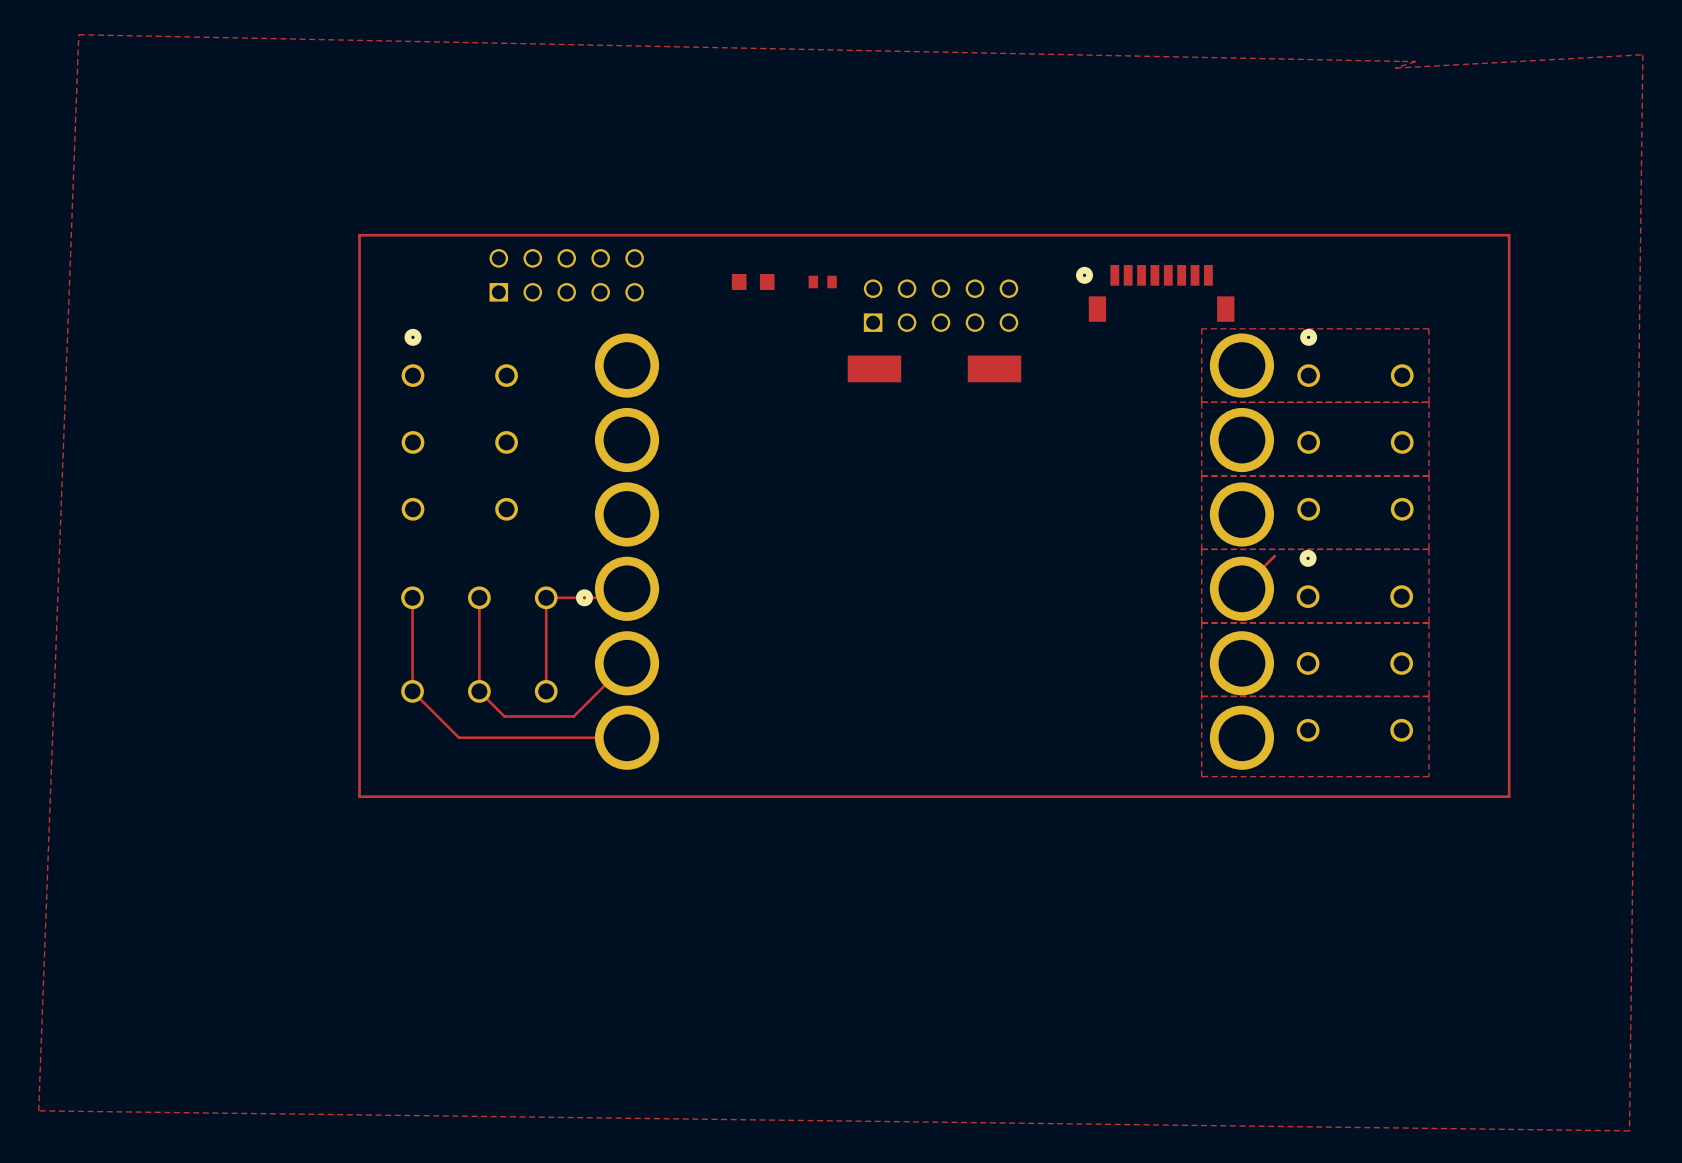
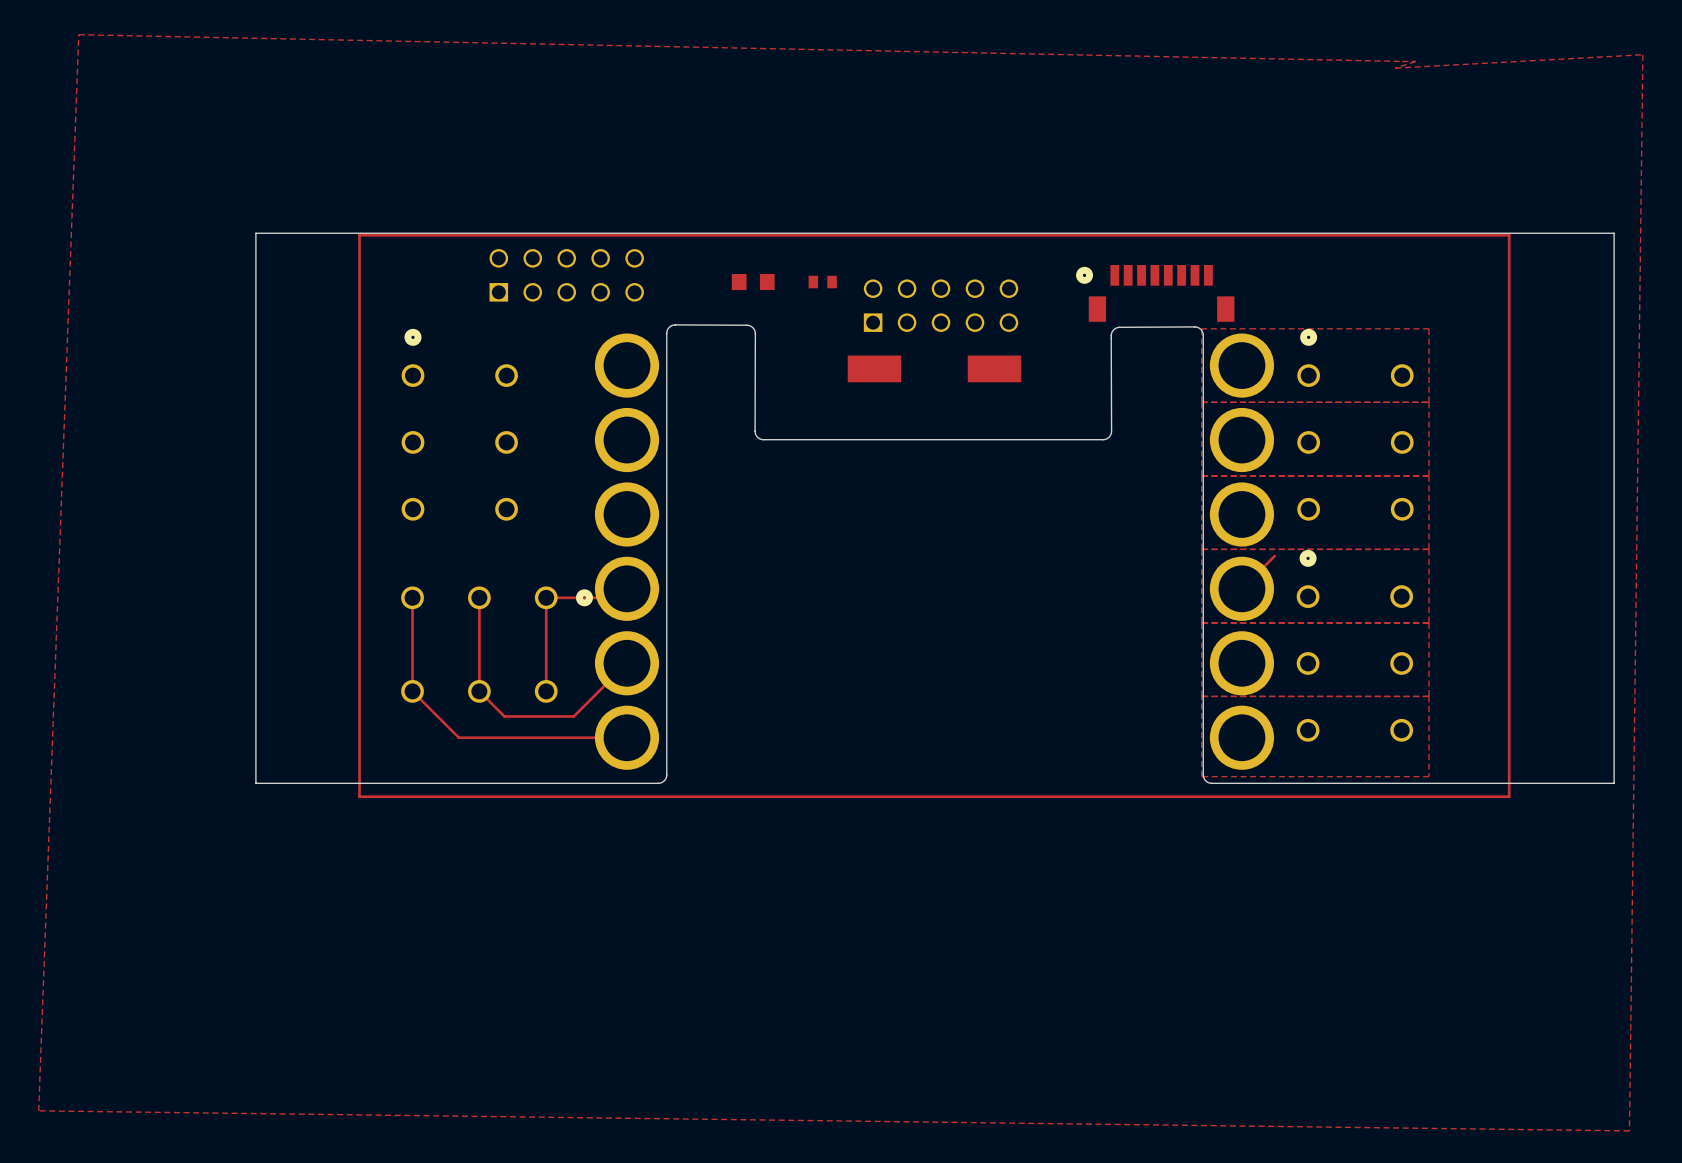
board edge: none -> (1614, 233) (1614, 783) (1211, 783) (1205, 780) (1203, 774) (1203, 335) (1198, 327) (1119, 327) (1112, 330) (1111, 335) (1111, 432) (1109, 436) (1104, 439) (763, 439) (758, 437) (755, 432) (755, 333) (753, 328) (746, 325) (675, 324) (669, 327) (666, 333) (666, 774) (664, 780) (658, 783) (255, 783) (255, 233) (1614, 233)

